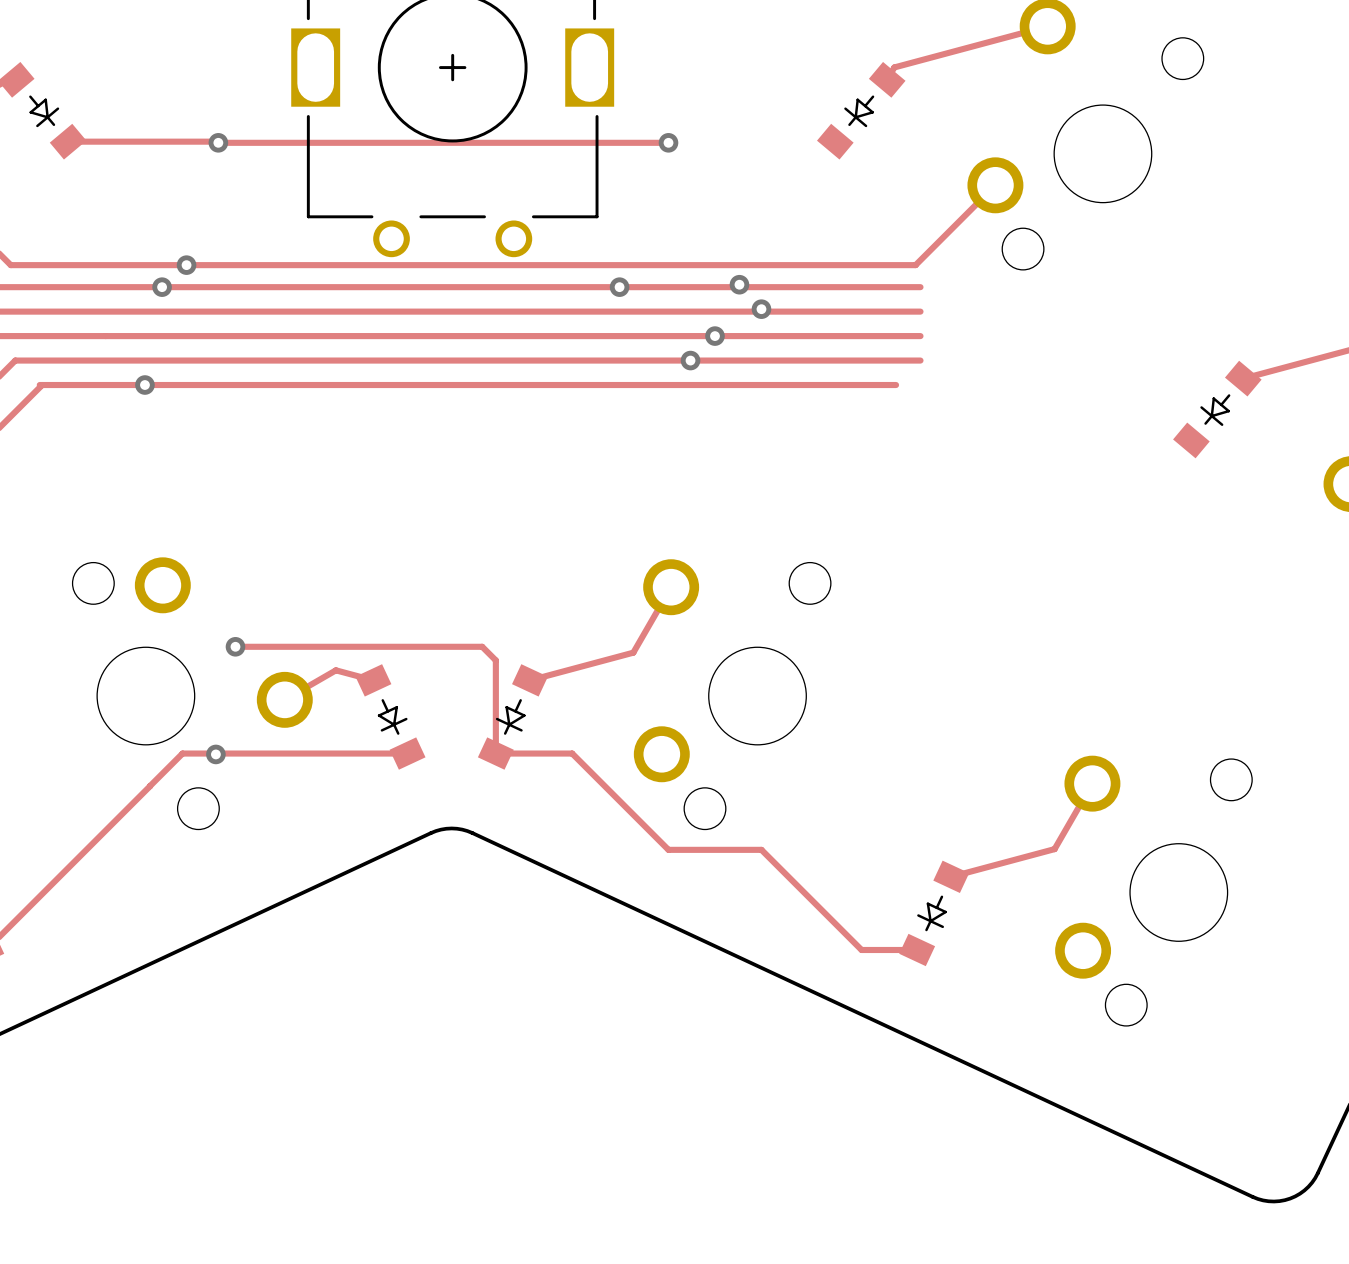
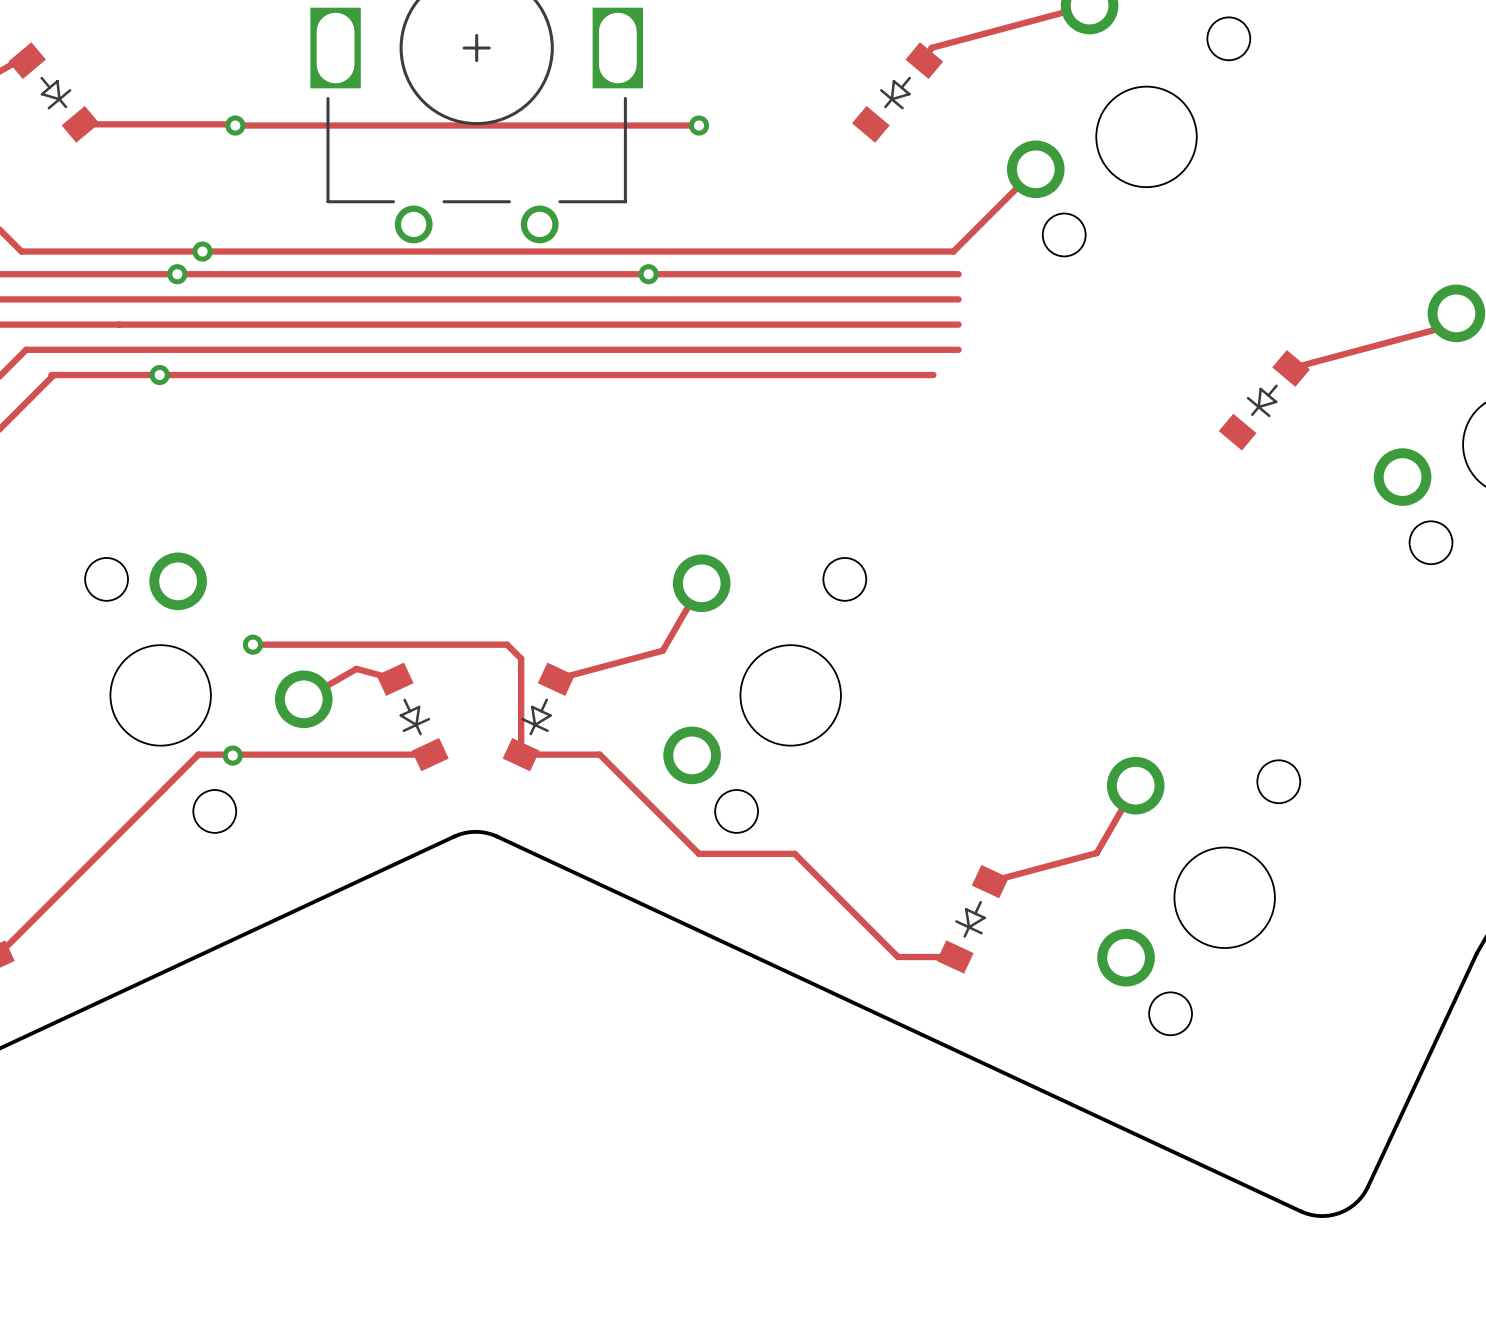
via: (739, 284) -> none
via: (761, 309) -> none
via: (714, 336) -> none
via: (690, 360) -> none

